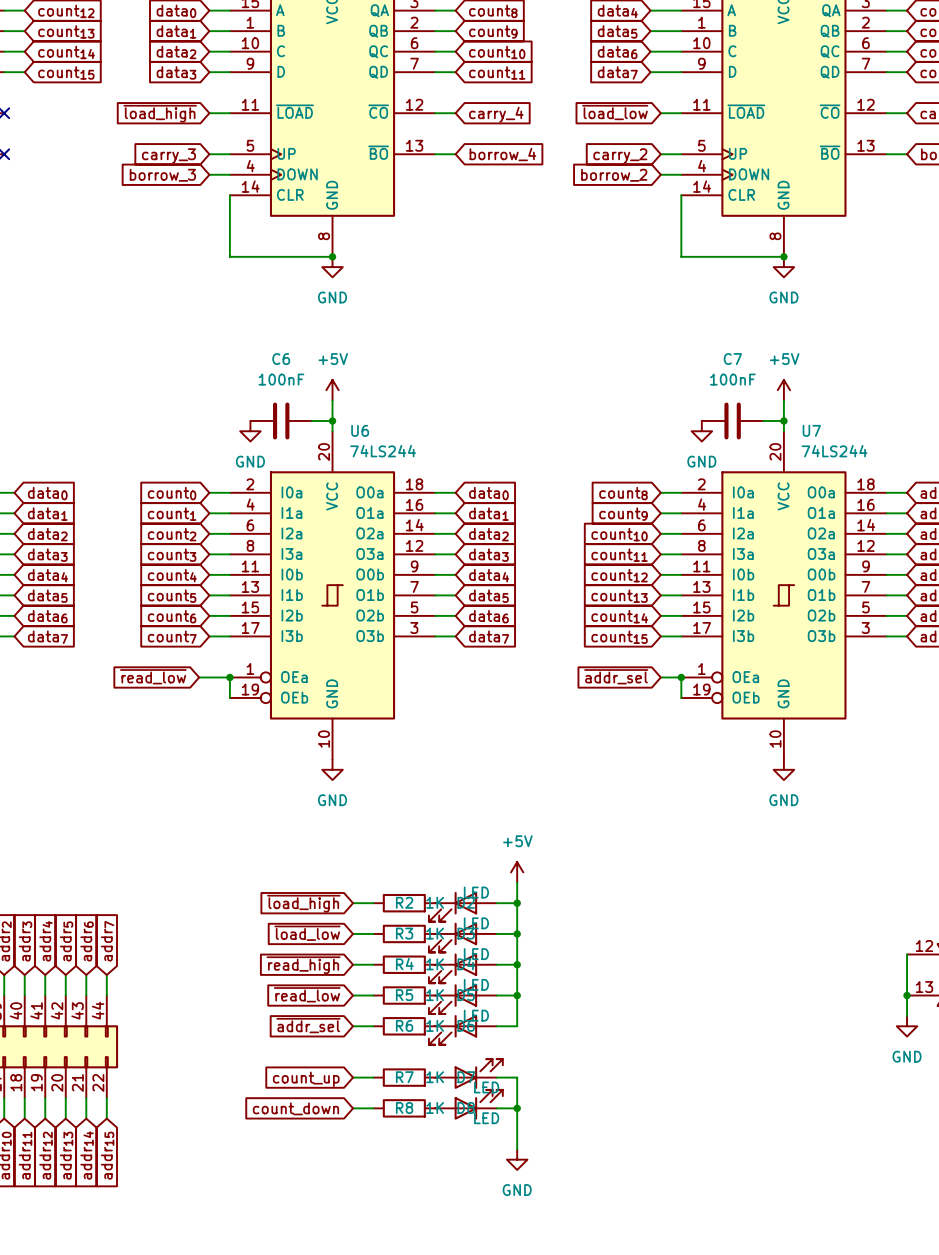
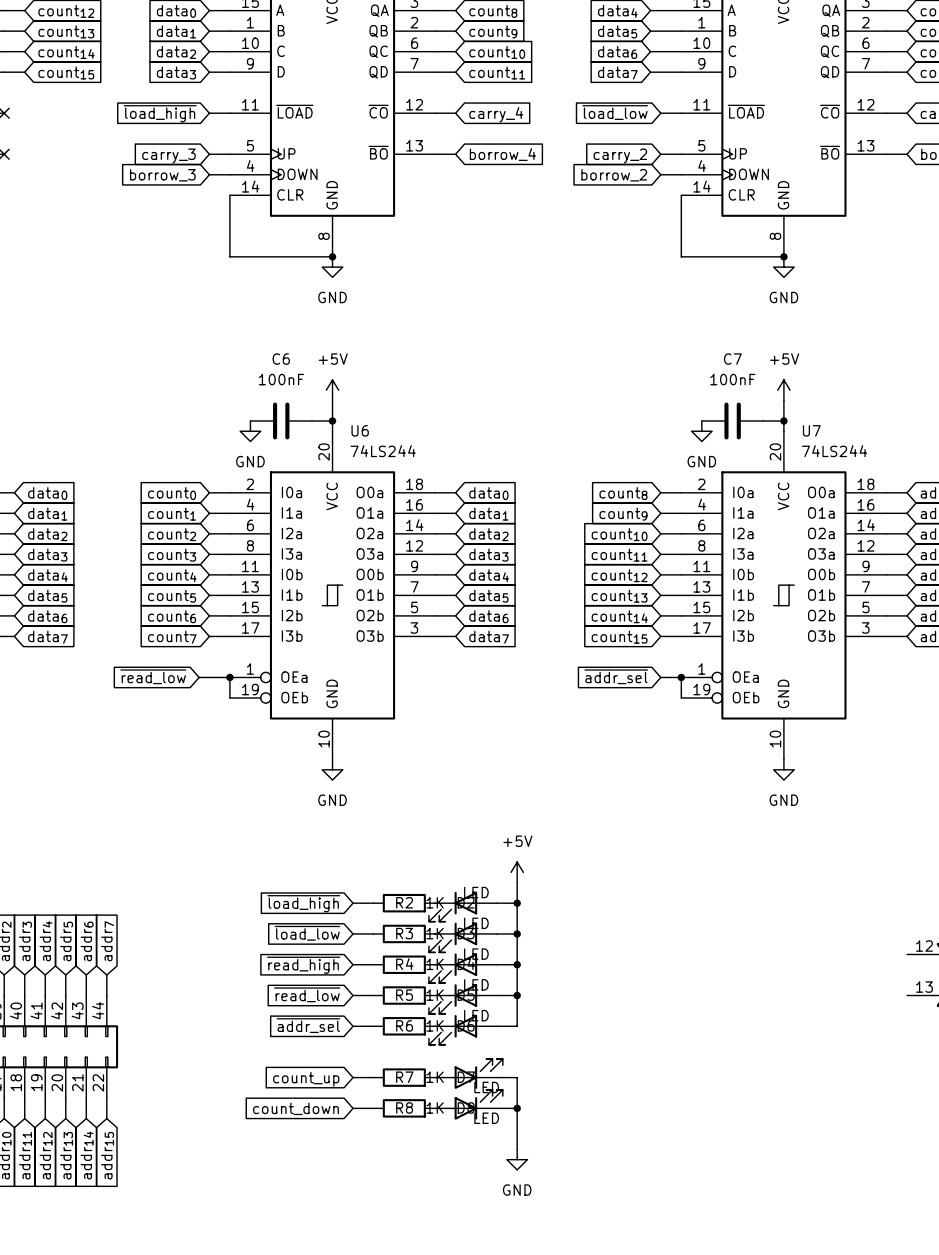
wire: (907, 954) (907, 1016) -> none
junction: (907, 995) -> none
power symbol: GND (907, 1026) -> none

